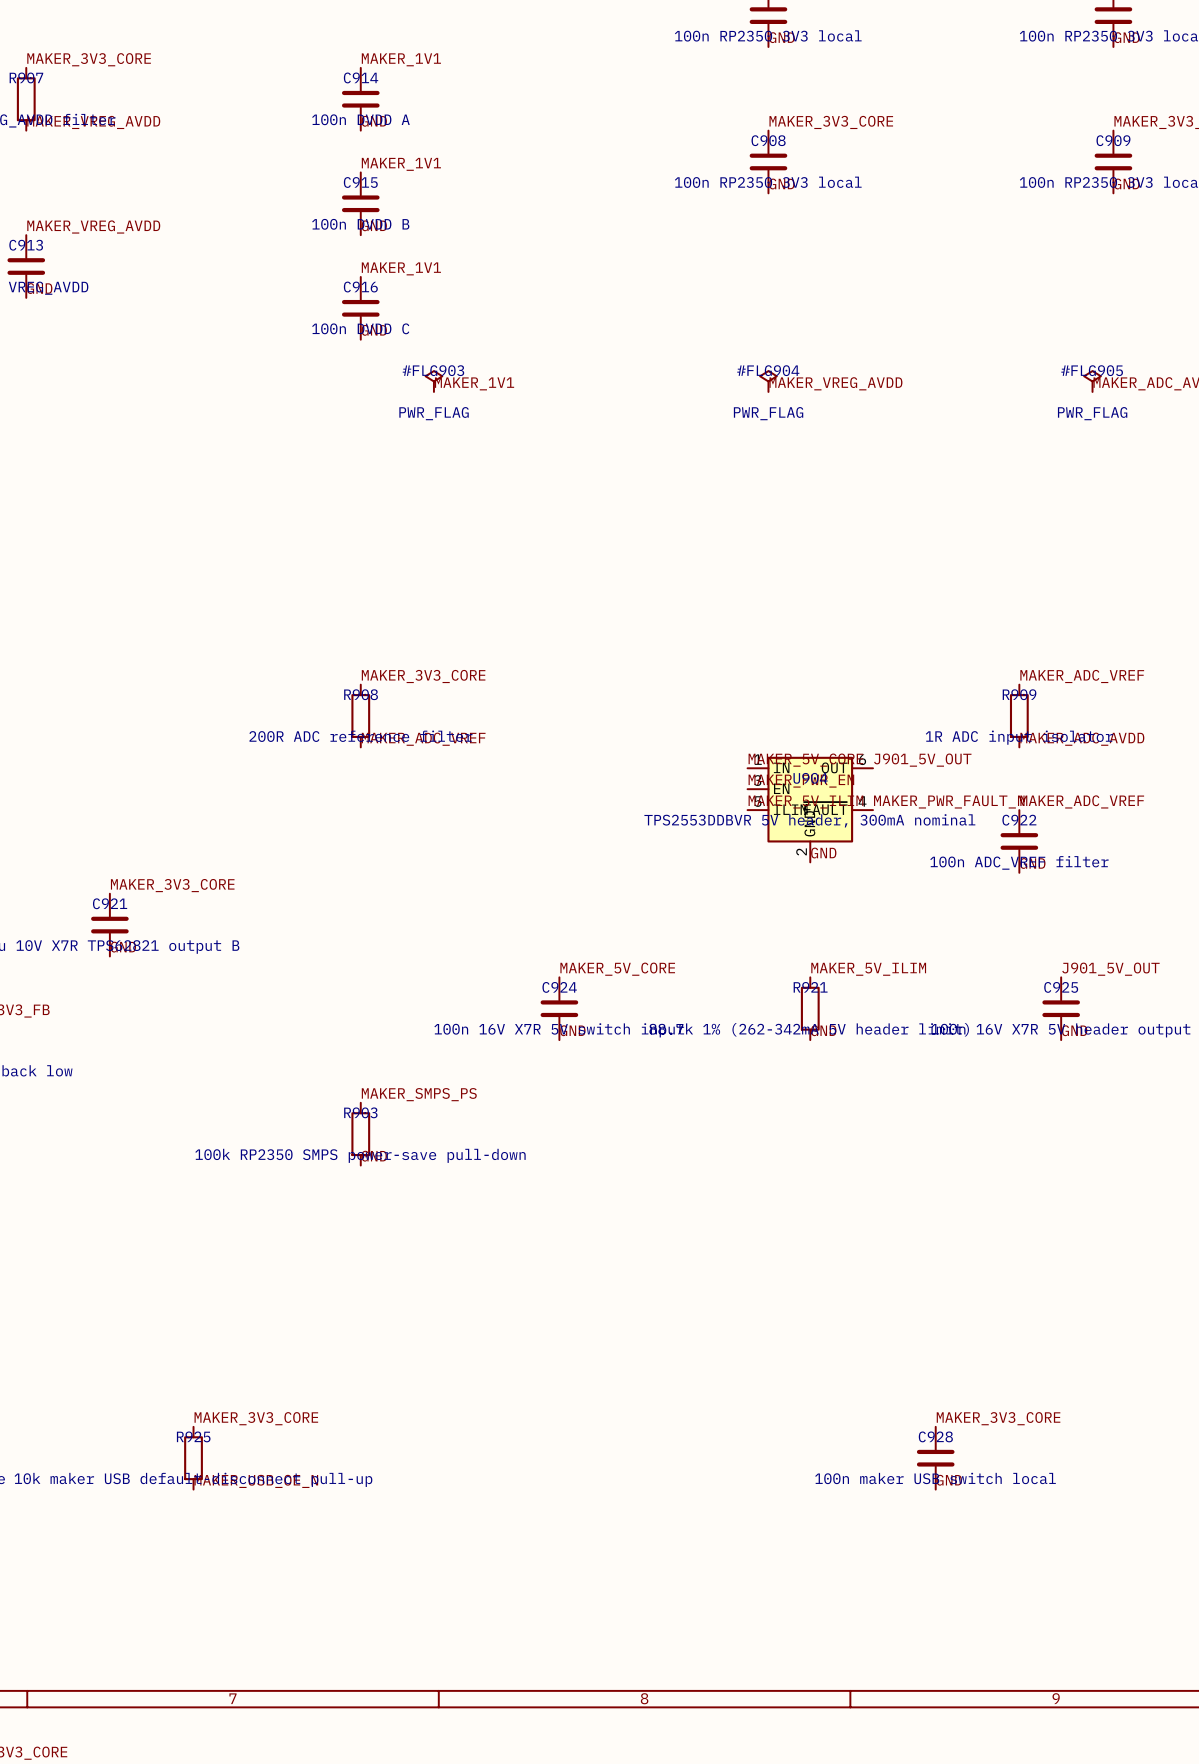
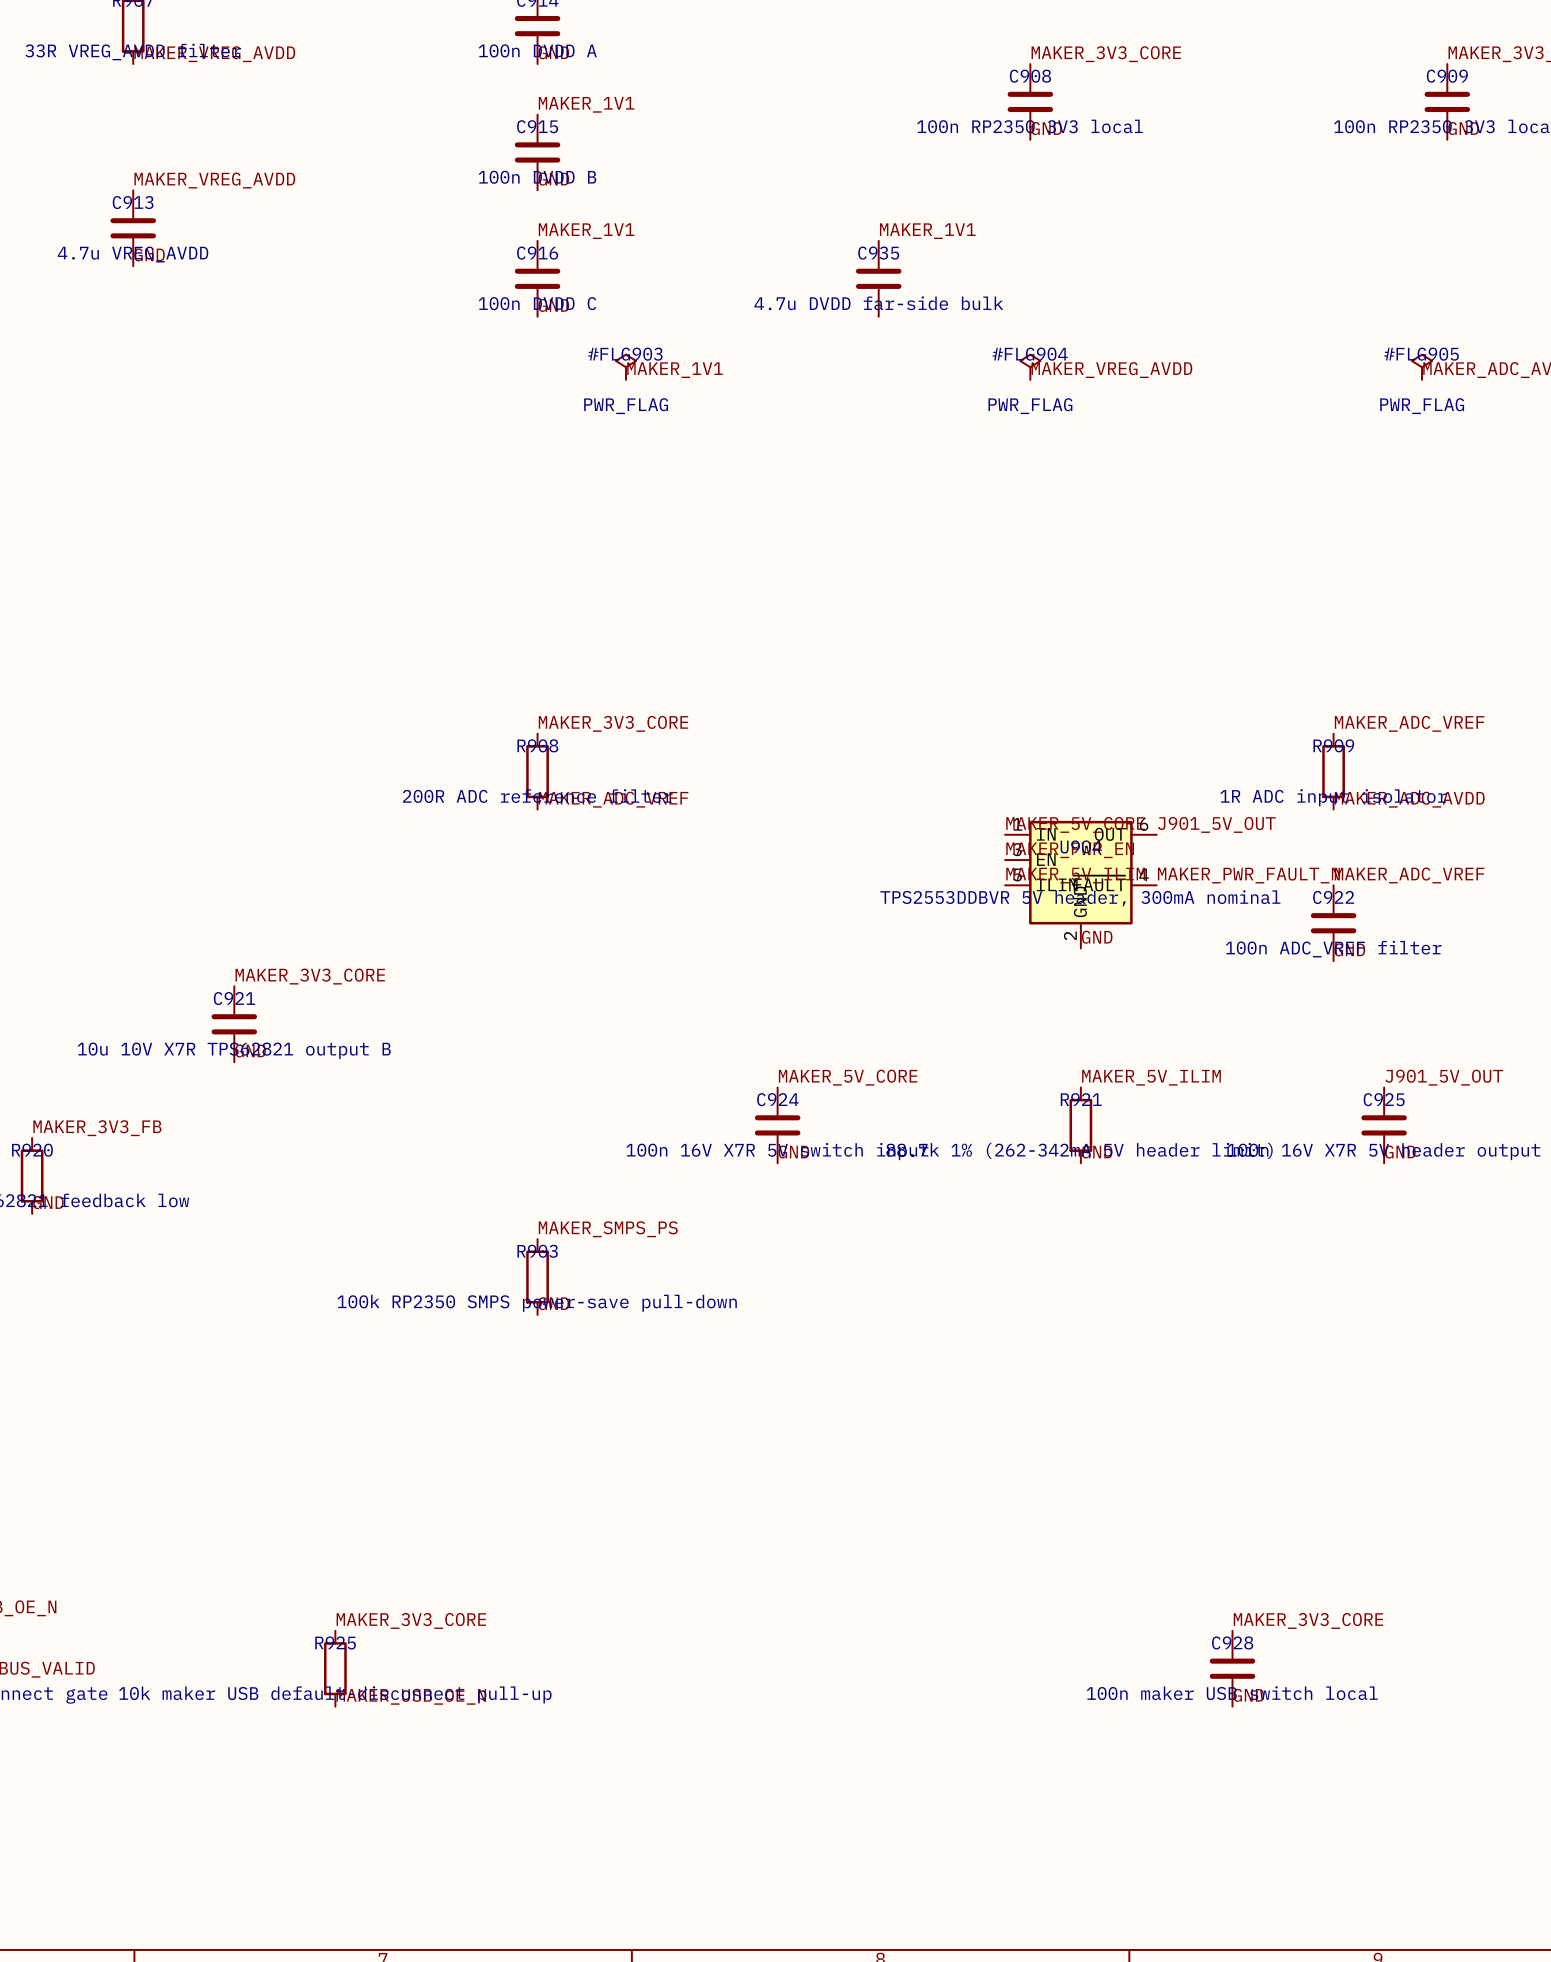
label: none -> MAKER_1V1 (927, 231)
C935: none -> 4.7u DVDD far-side bulk (878, 278)

